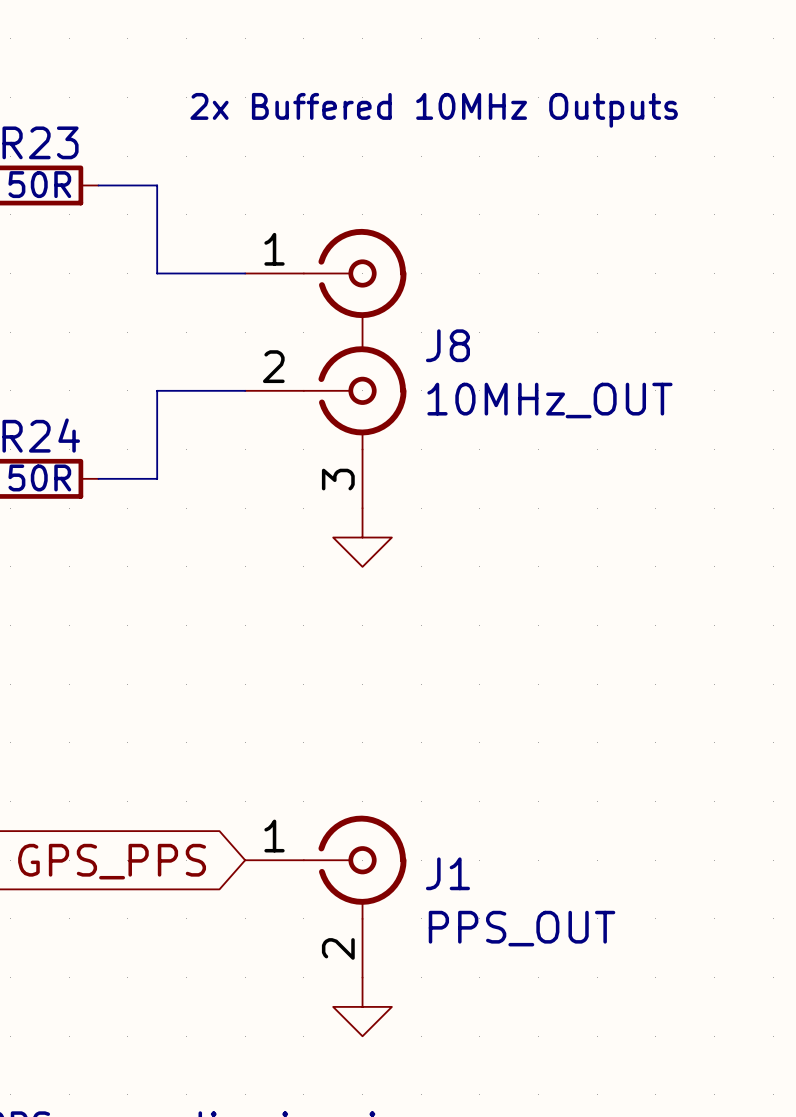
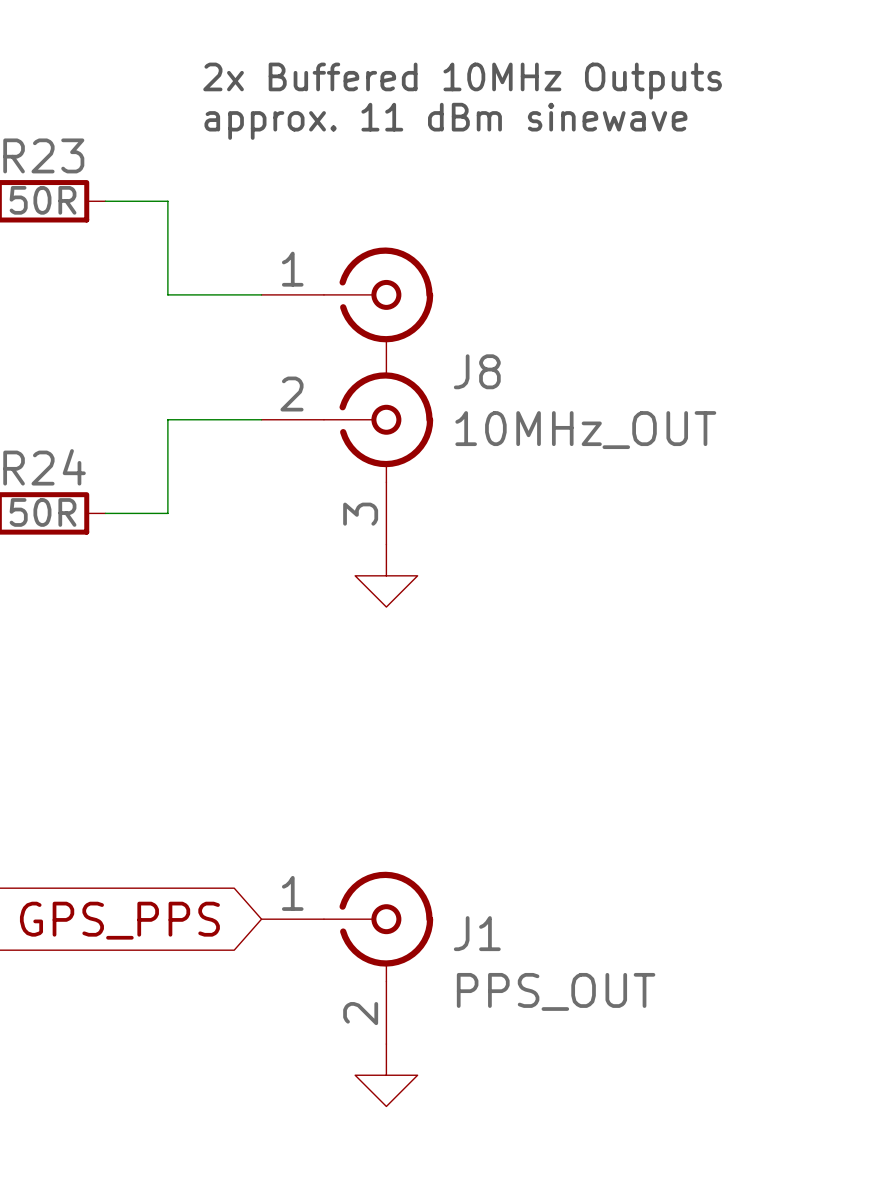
text: none -> 2x Buffered 10MHz Outputs (462, 81)
text: 2x Buffered 10MHz Outputs (434, 110) -> approx. 11 dBm sinewave (445, 121)

